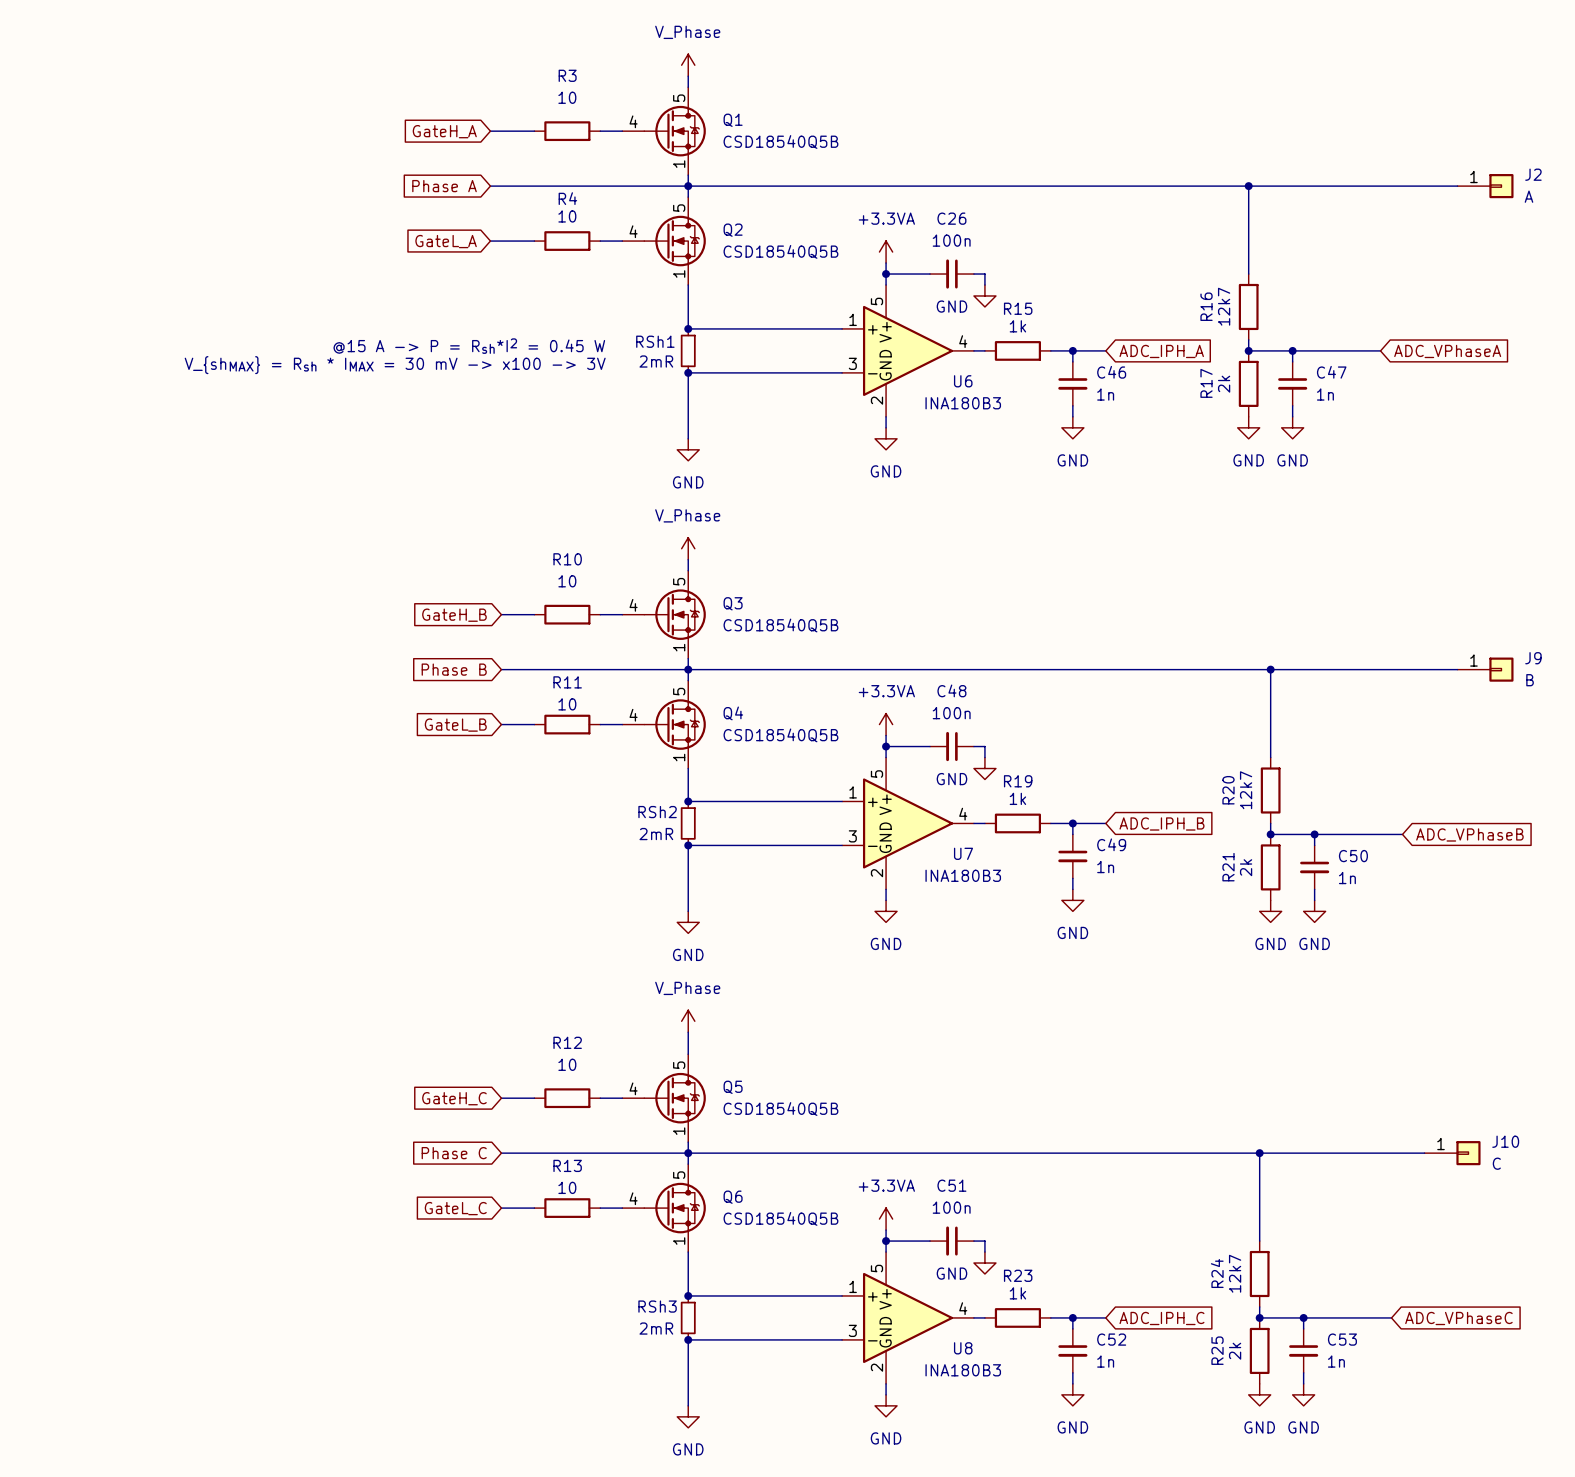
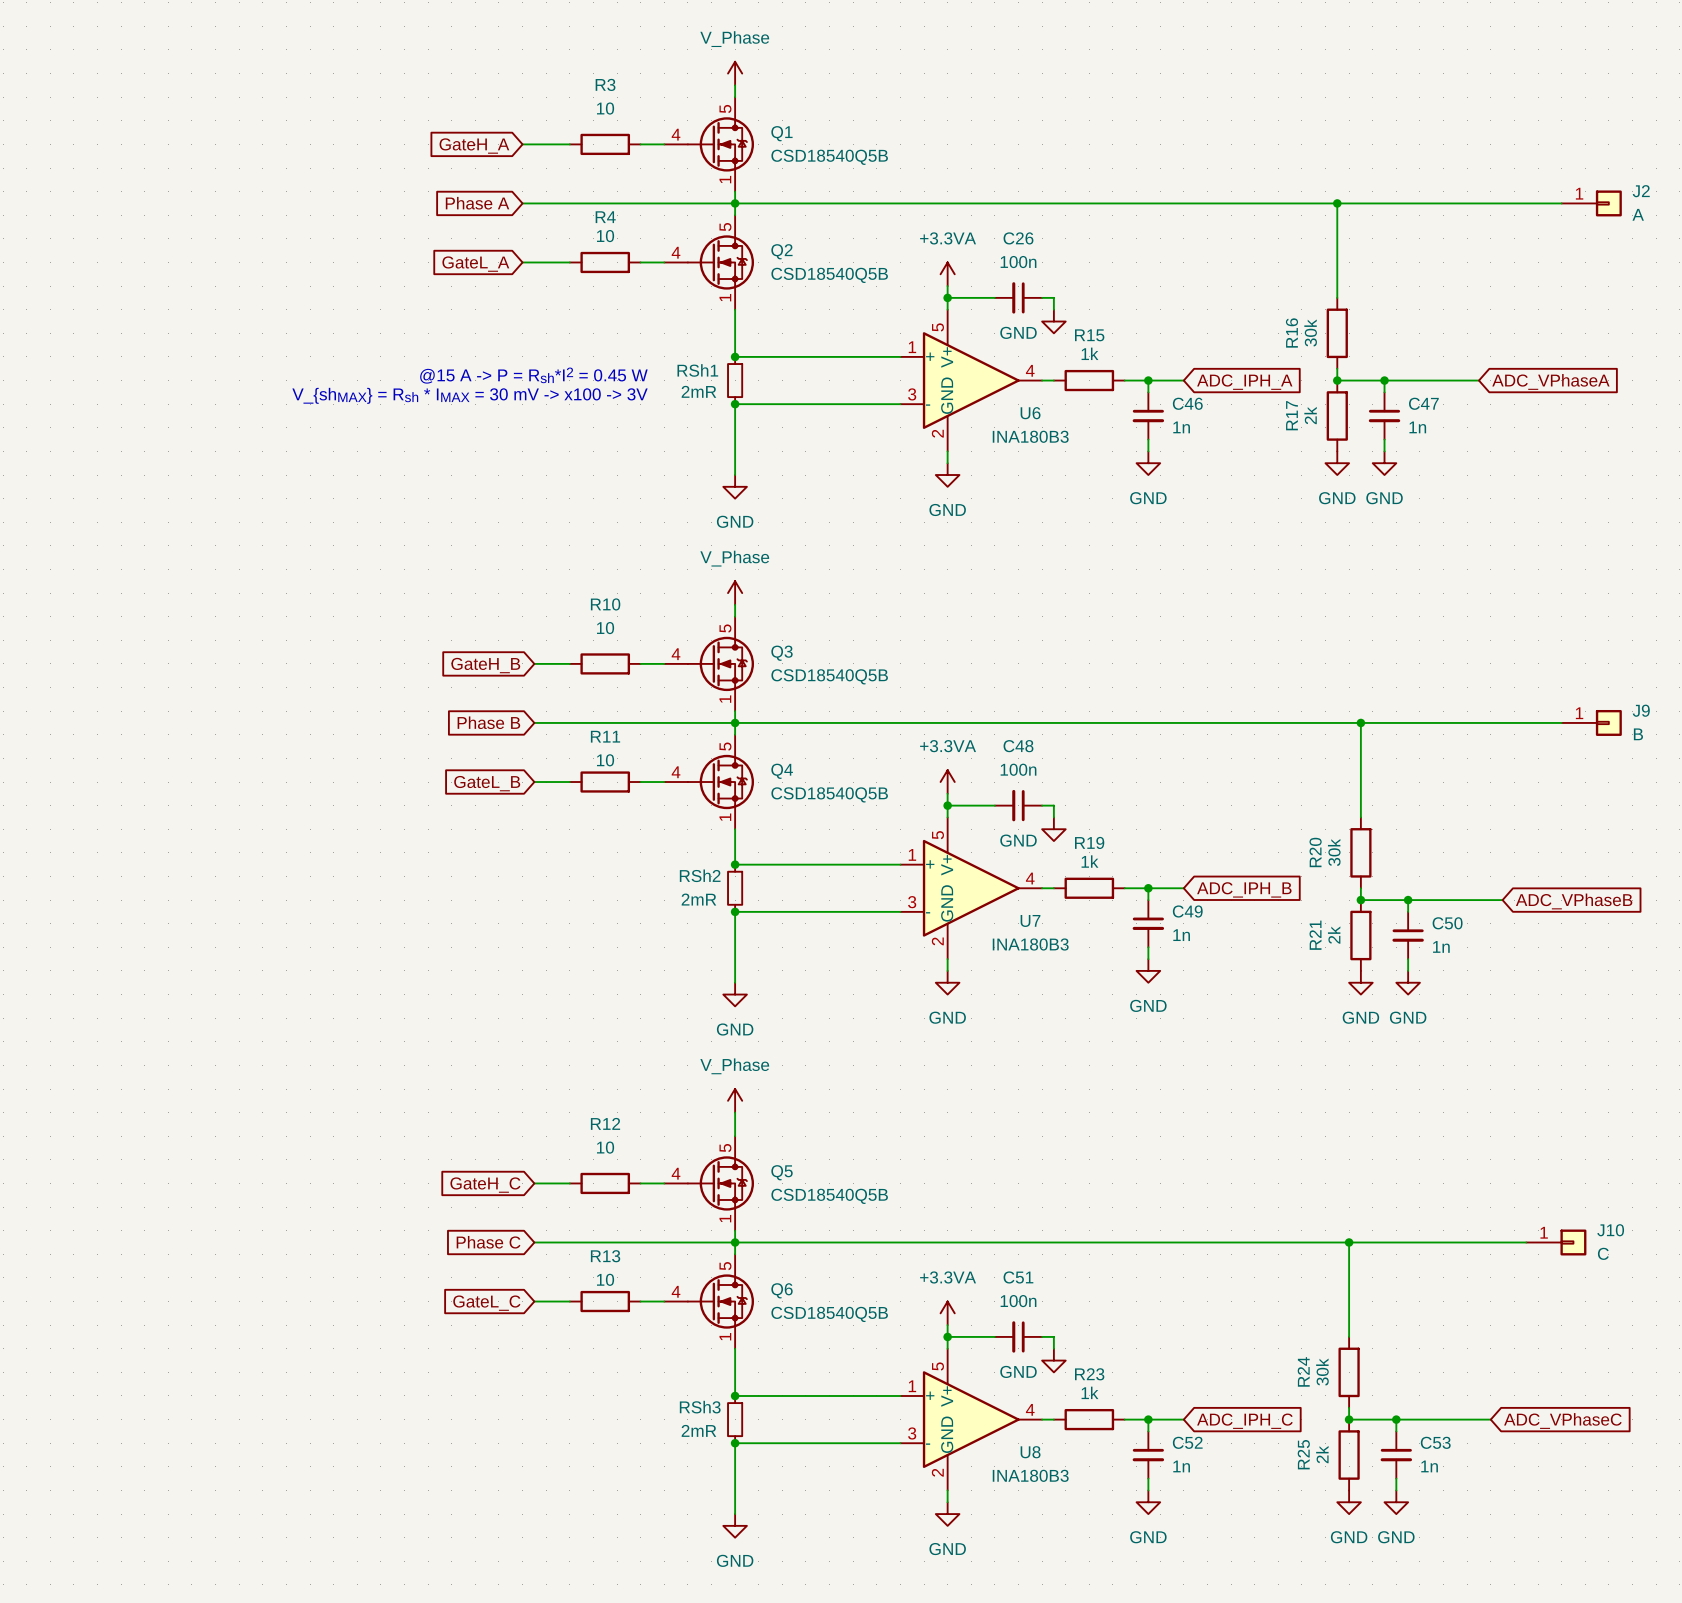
R16 value: 12k7 (1224, 306) -> 30k (1310, 332)
R20 value: 12k7 (1246, 790) -> 30k (1334, 852)
R24 value: 12k7 (1235, 1273) -> 30k (1322, 1372)

